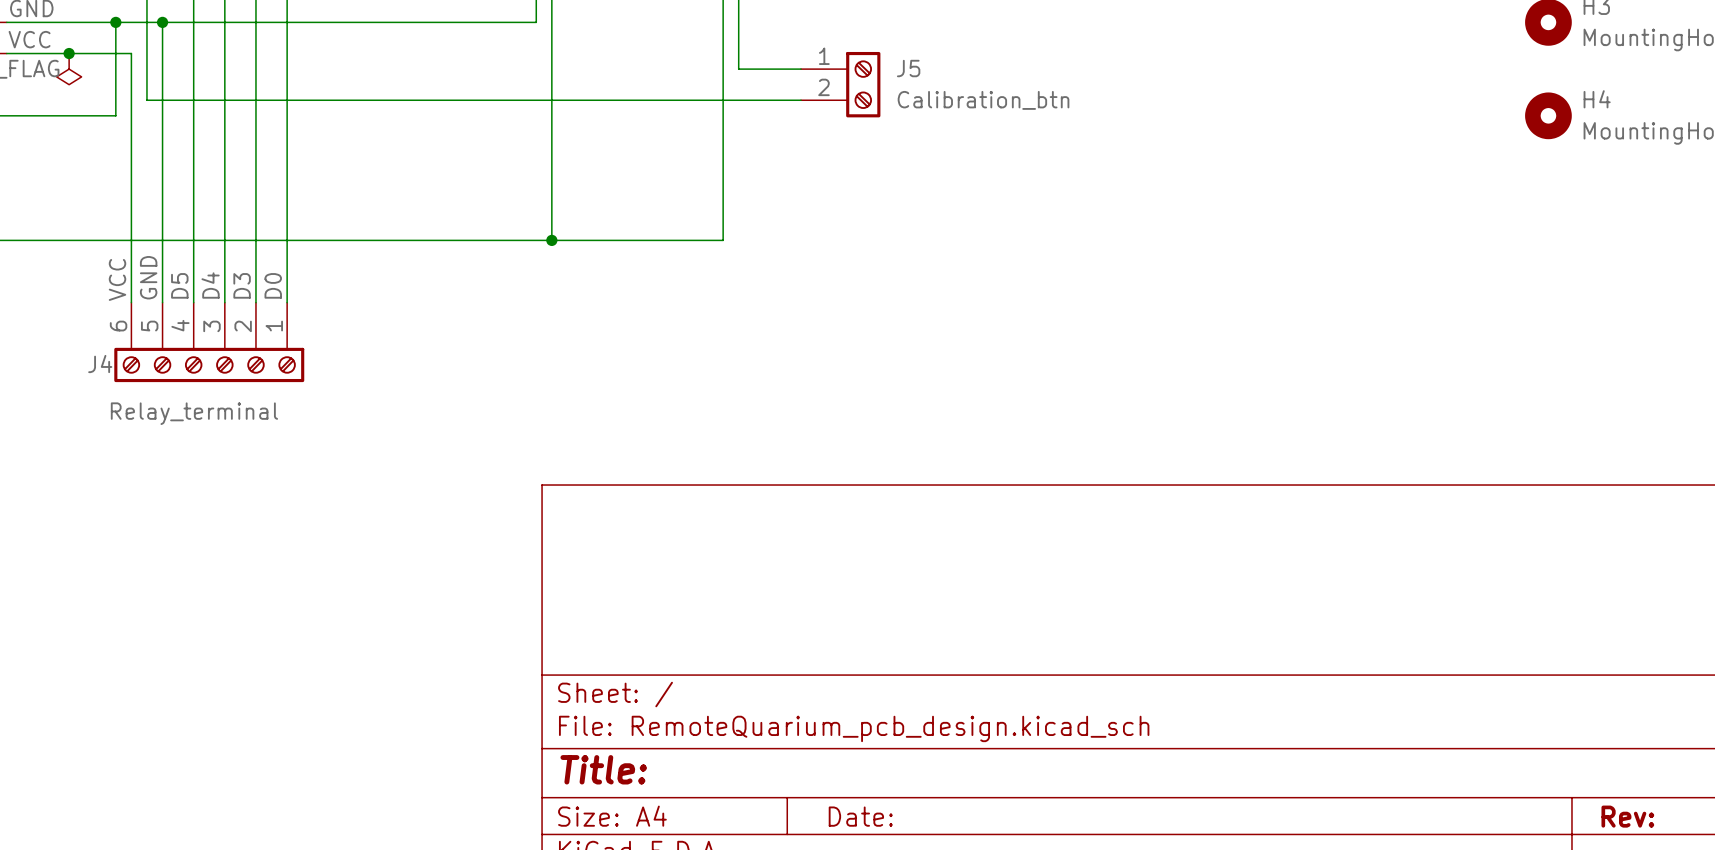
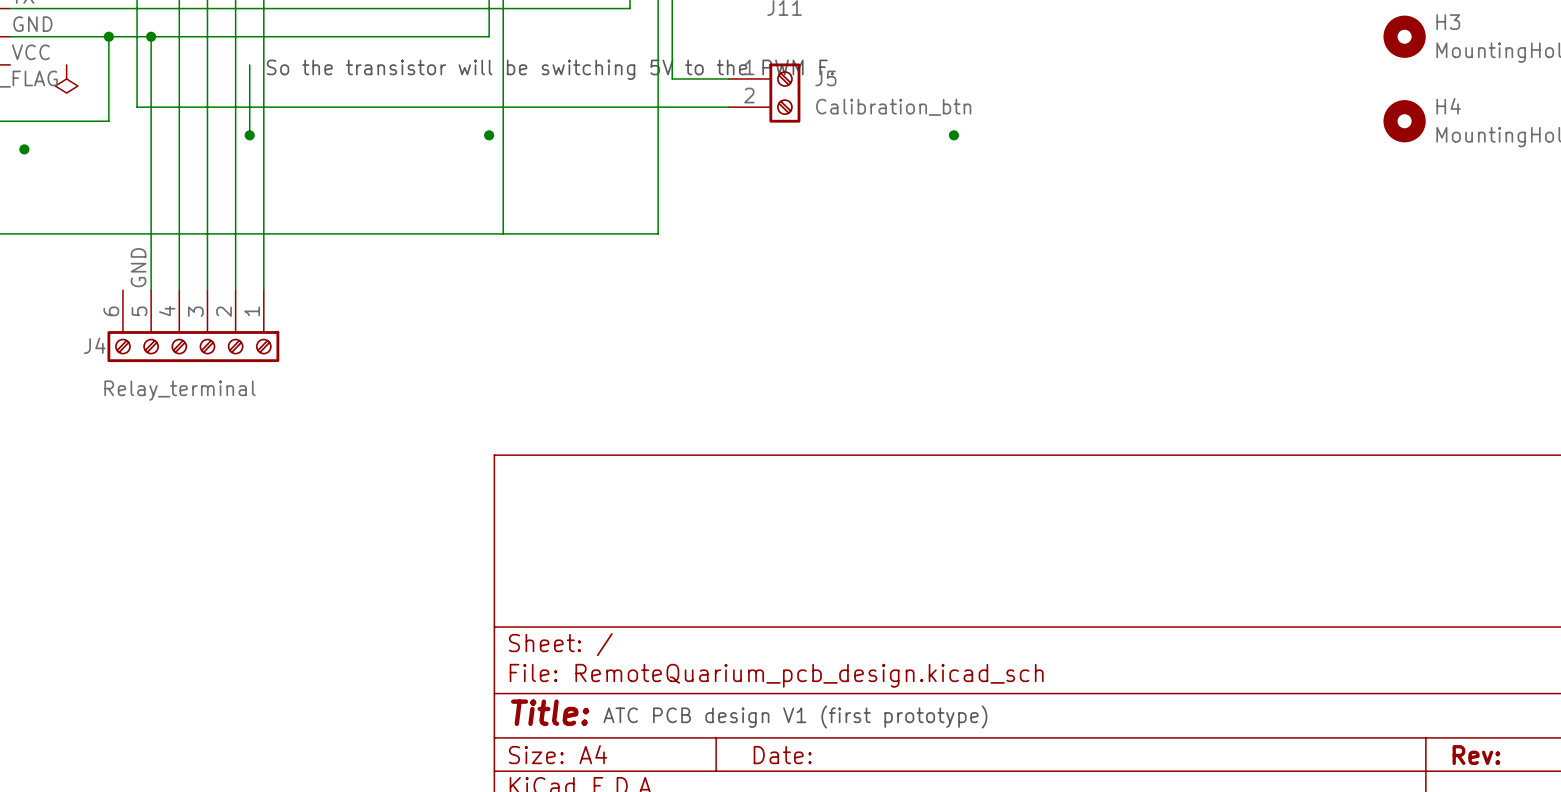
wire: (6, 53) (131, 53) (131, 302) -> none
junction: (69, 53) -> none
wire: none -> (249, 64) (249, 135)
text: none -> So the transistor will be switching 5V to the PWM F. (550, 69)
junction: none -> (249, 135)
junction: none -> (489, 135)
junction: none -> (953, 135)
junction: none -> (24, 149)
junction: (551, 240) -> none
label: VCC (117, 279) -> none
label: D5 (179, 285) -> none
label: D4 (210, 285) -> none
label: D3 (242, 285) -> none
label: D0 (273, 285) -> none
text: none -> ATC PCB design V1 (first prototype) (795, 716)

